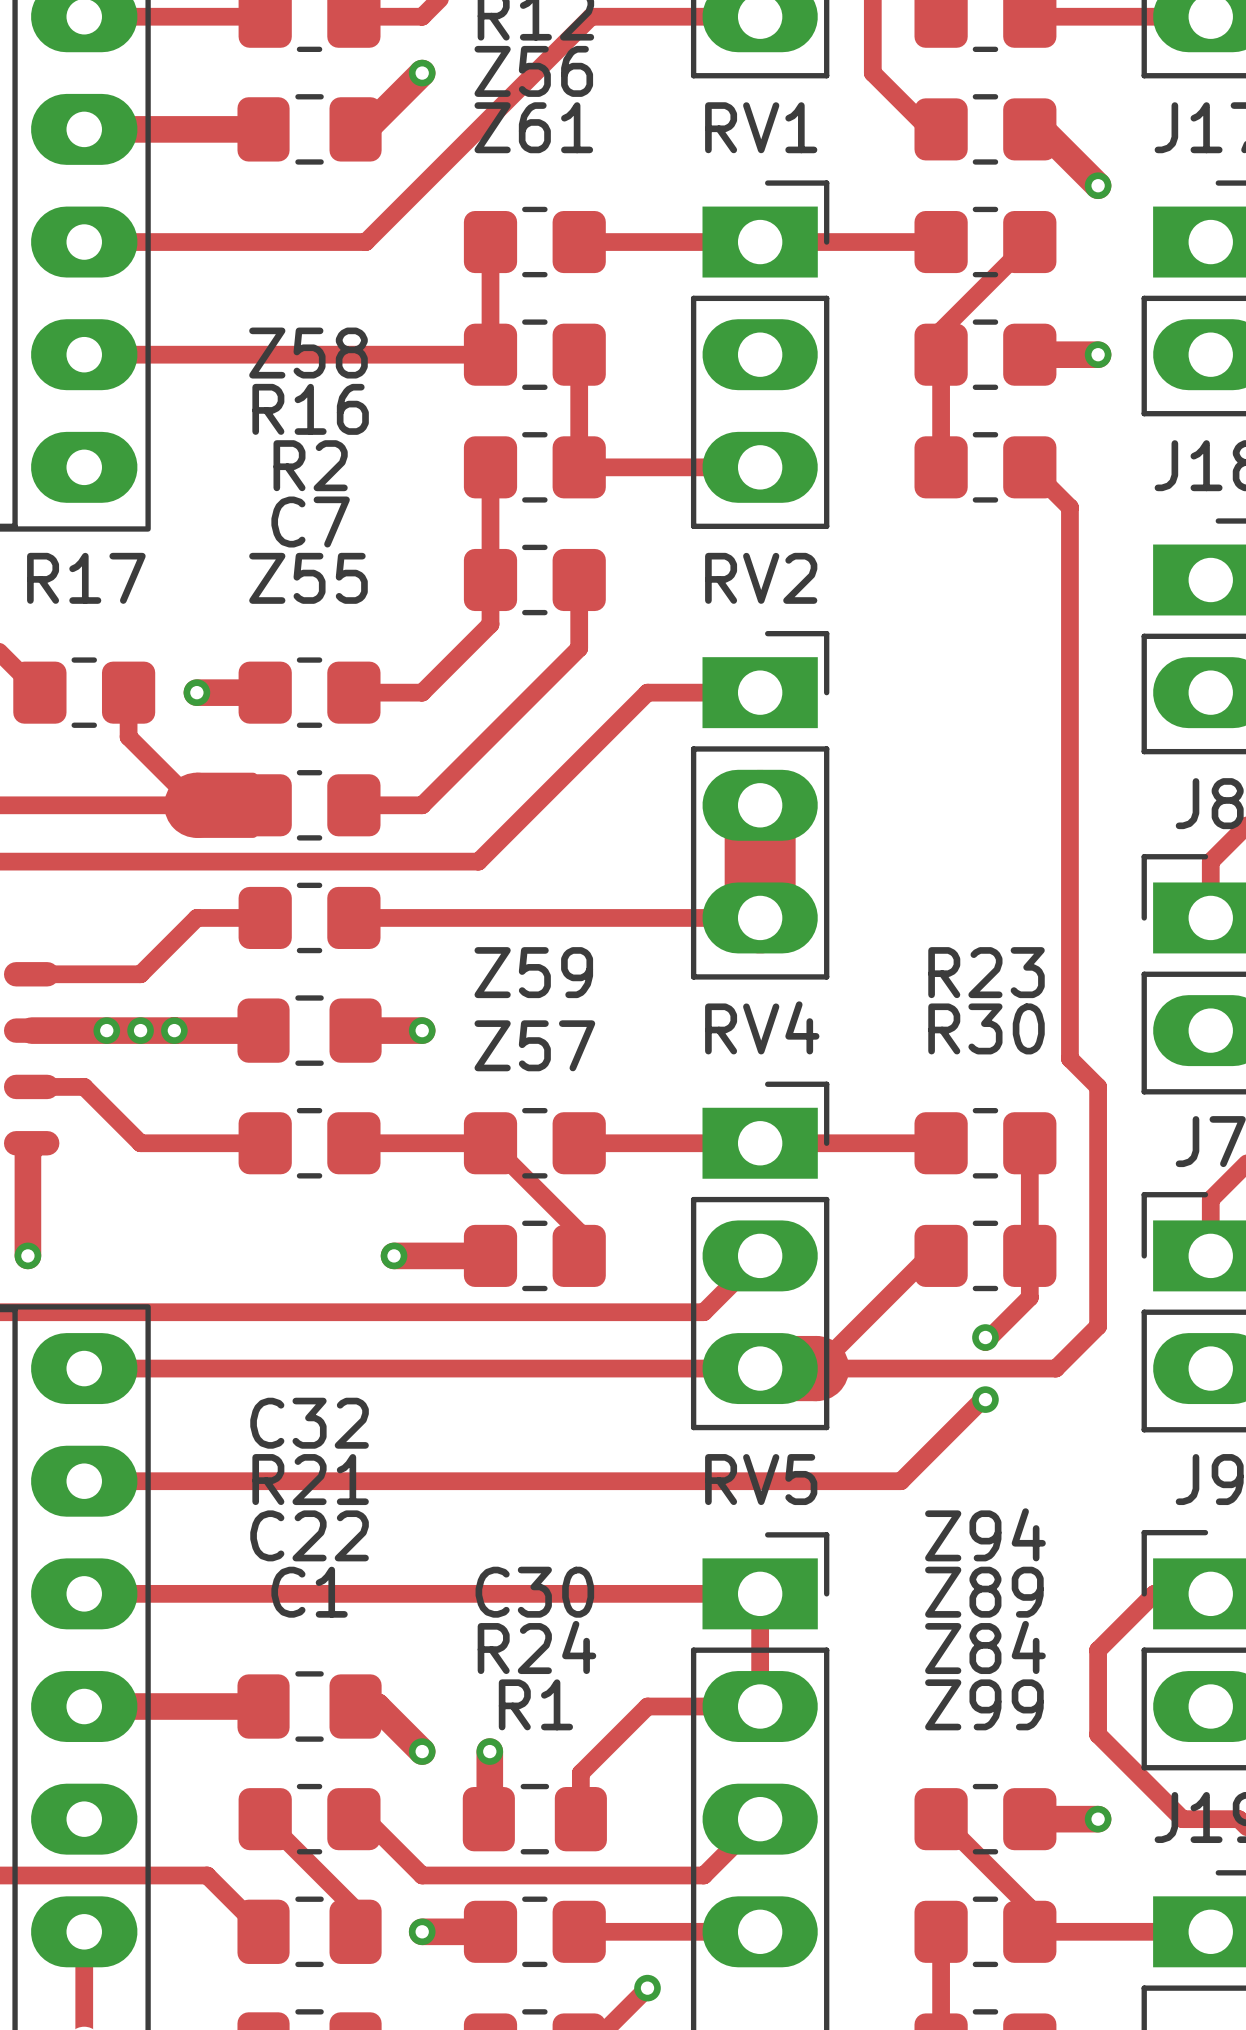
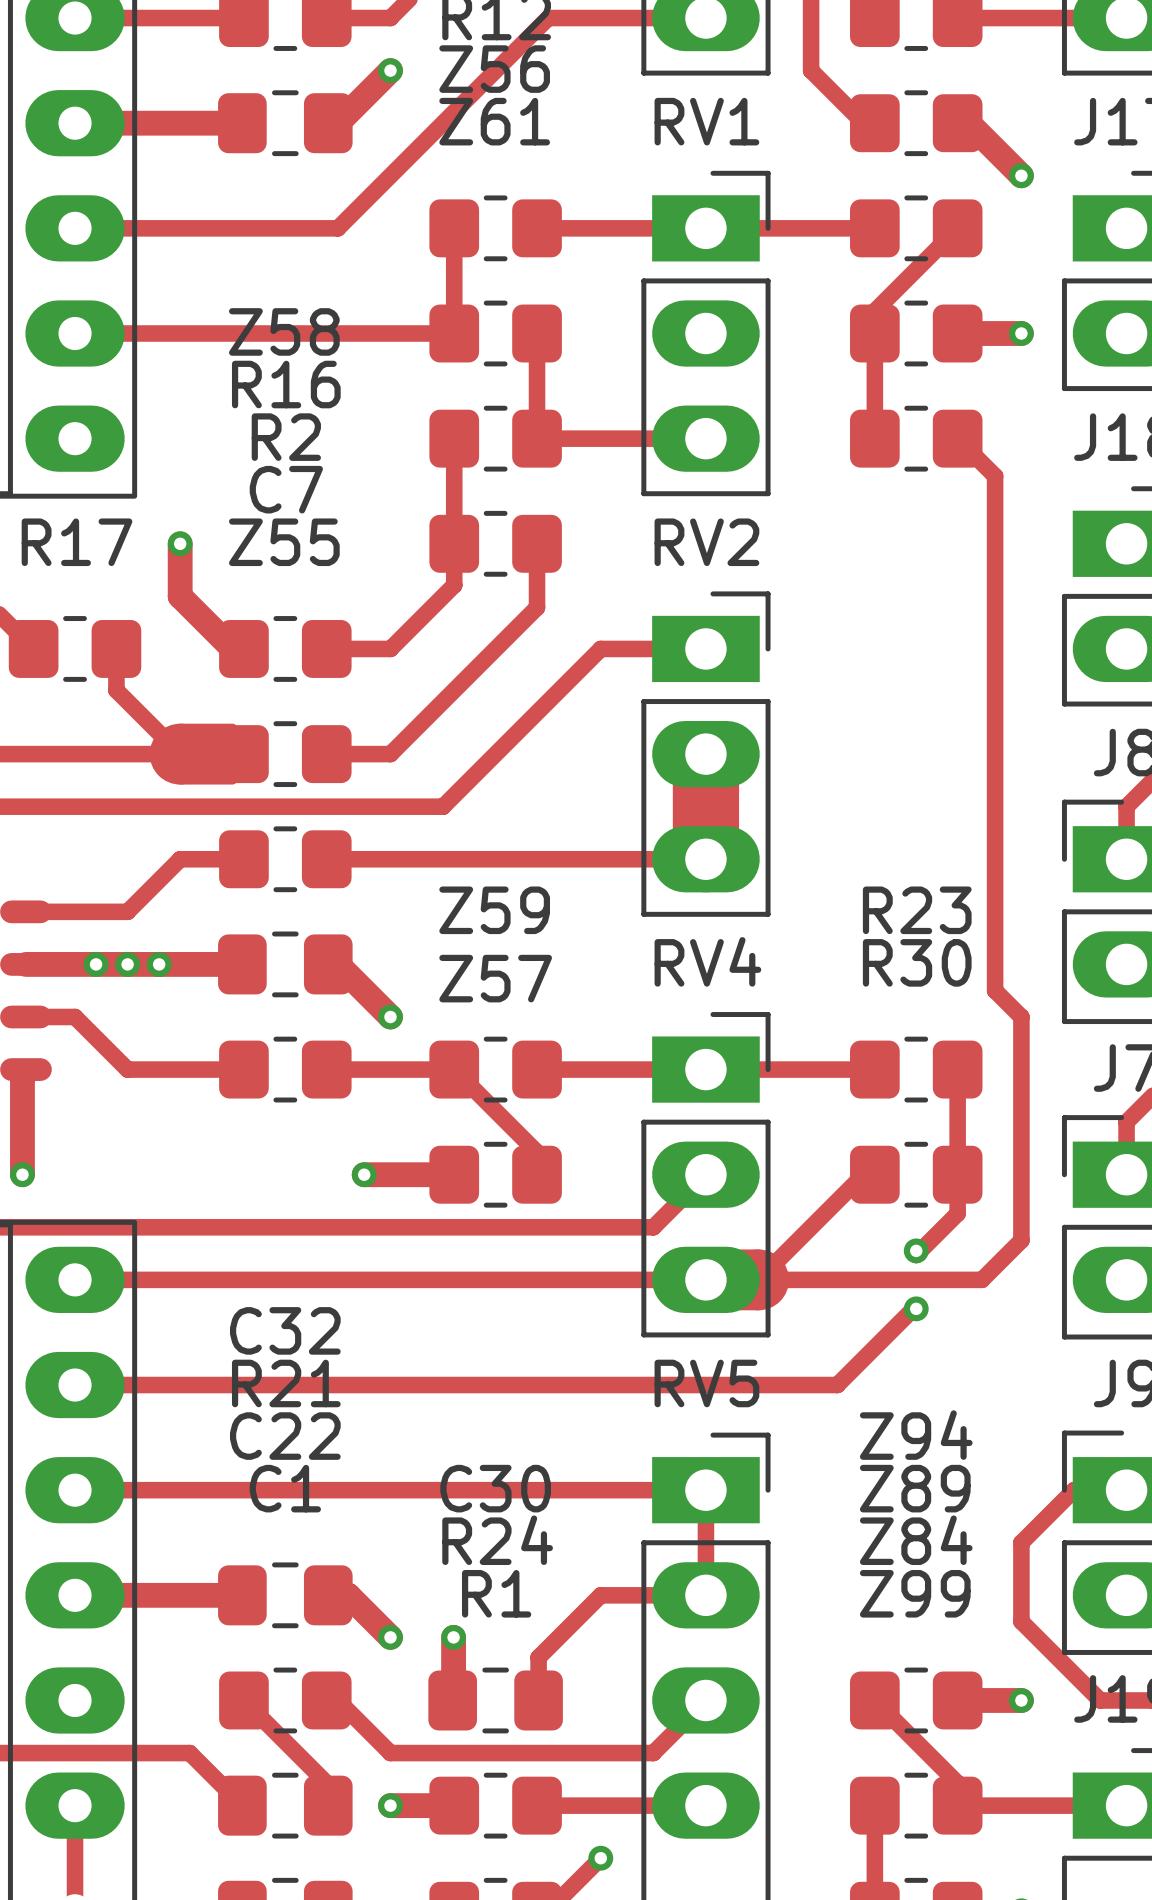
track: (196, 692) (253, 692) -> (180, 543) (180, 596) (232, 648)
via position: (196, 692) -> (180, 543)
track: (365, 1030) (422, 1030) -> (337, 964) (390, 1016)
via position: (422, 1030) -> (390, 1016)

